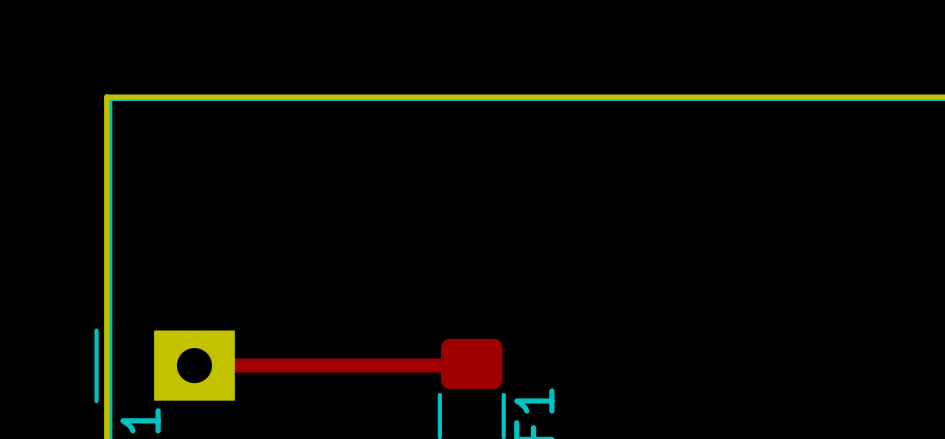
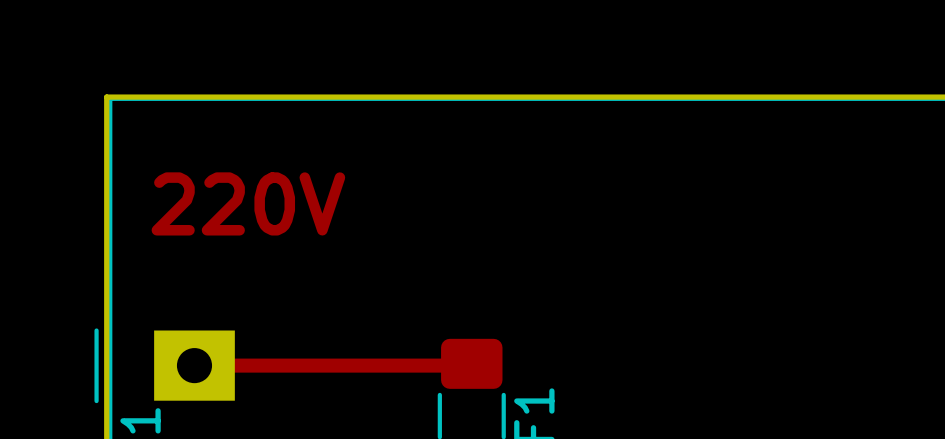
text: none -> 220V (248, 203)

